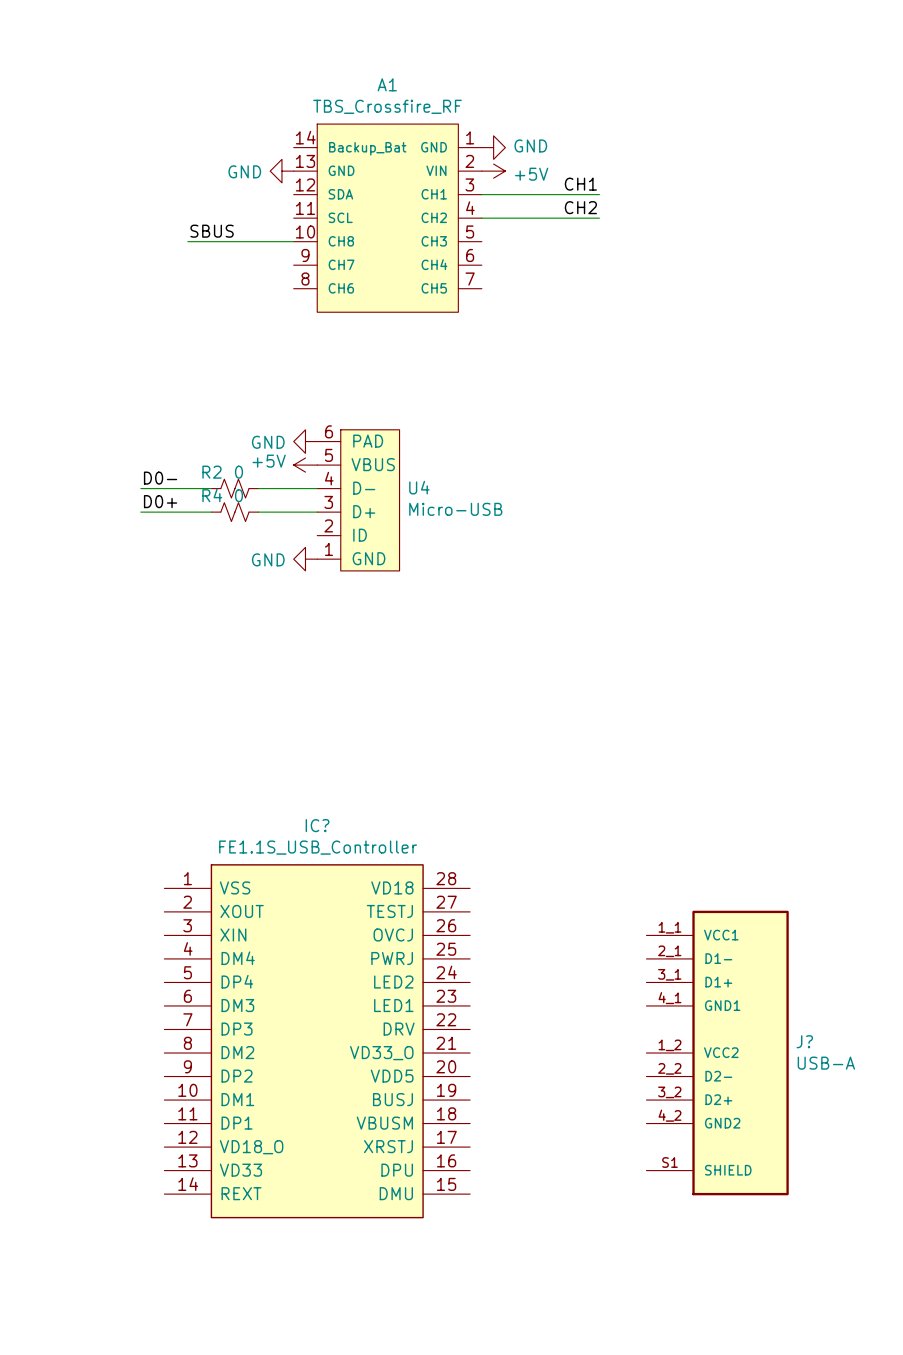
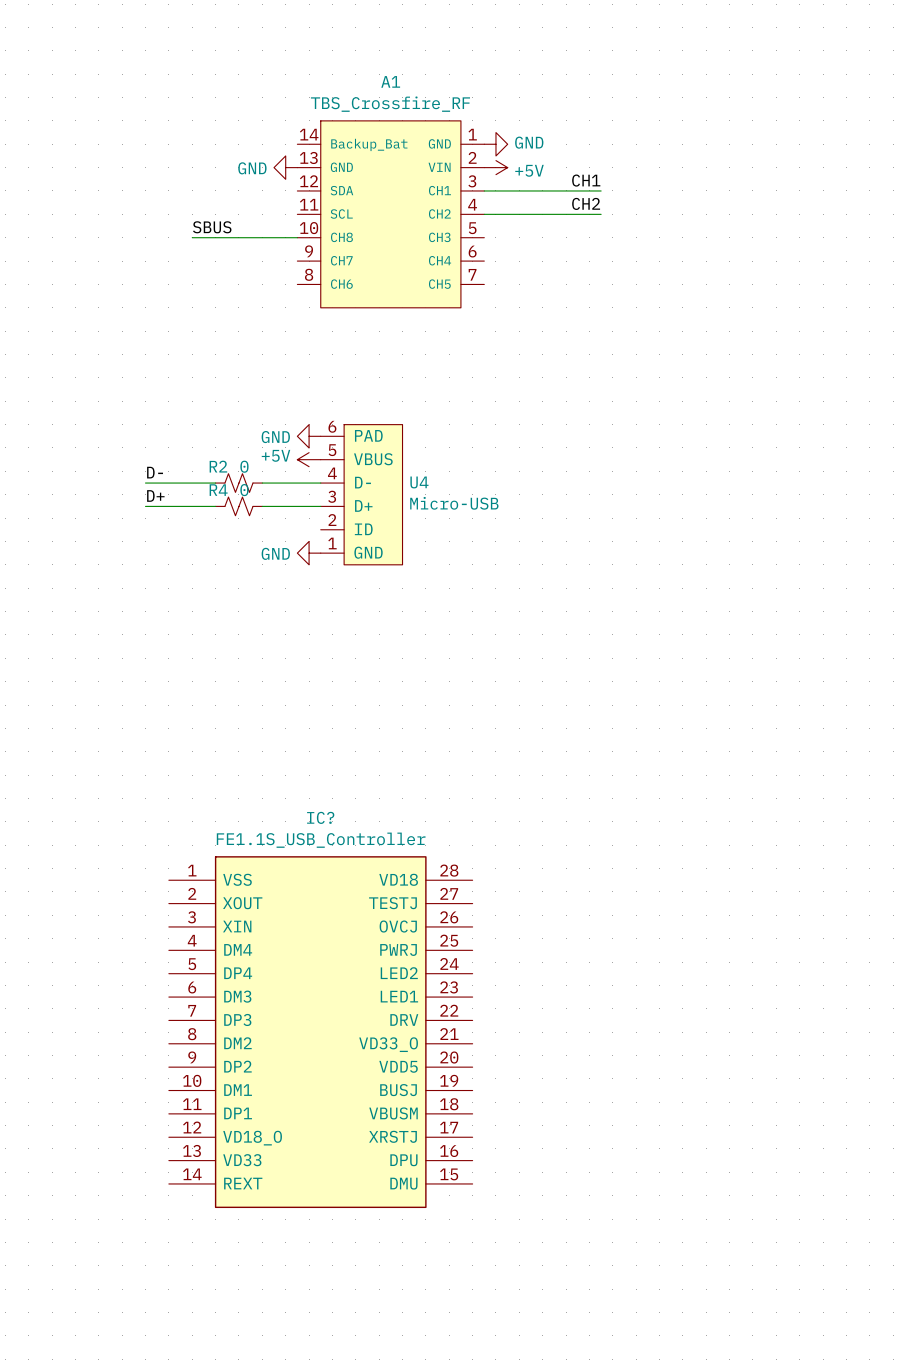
label: D0- (160, 478) -> D- (155, 472)
label: D0+ (160, 501) -> D+ (155, 495)
J?: USB-A (717, 1053) -> none

